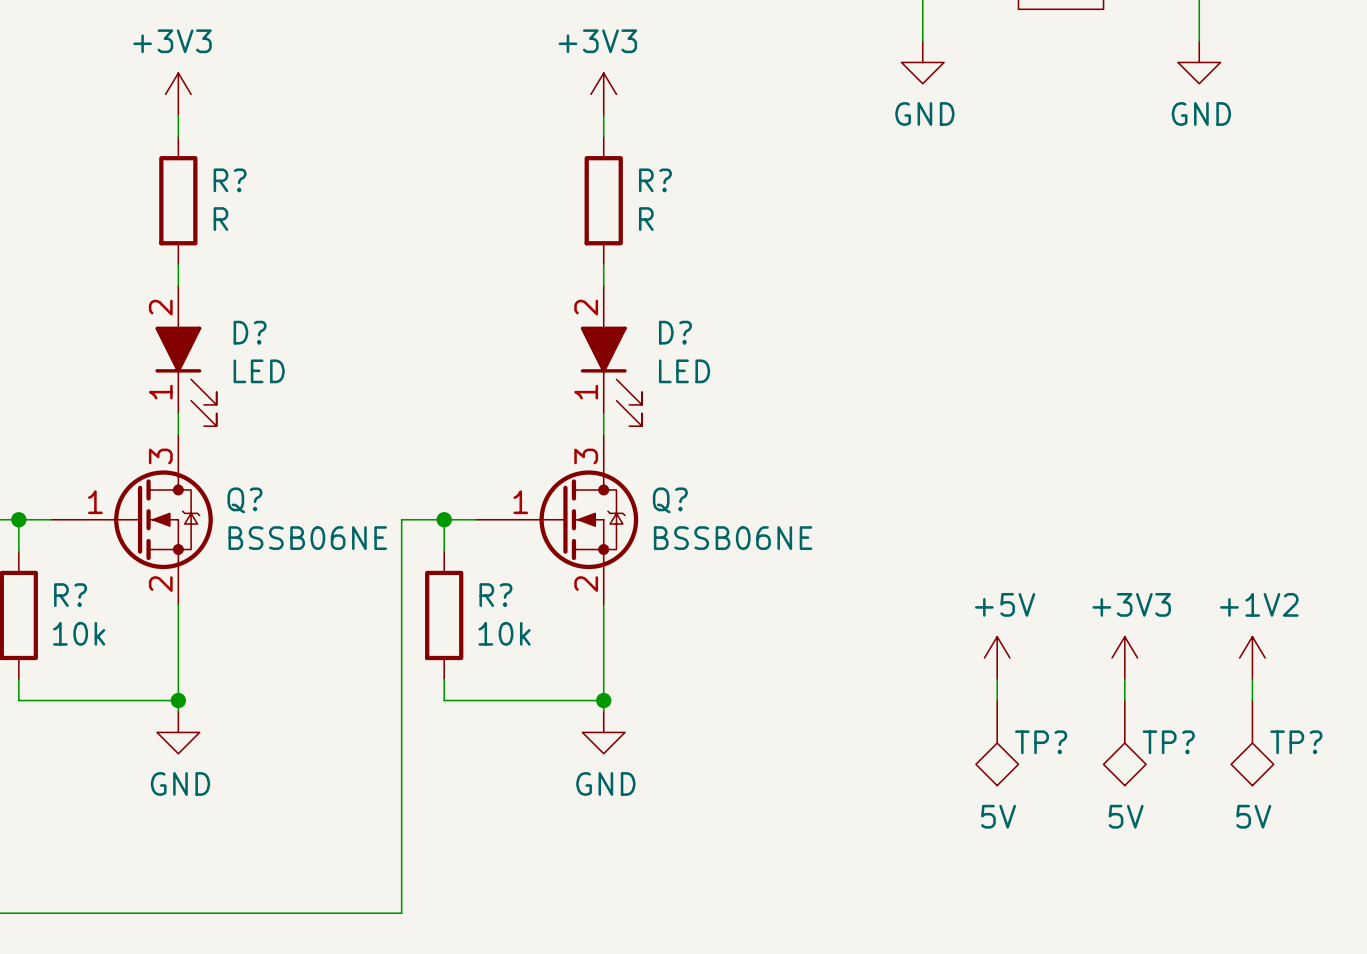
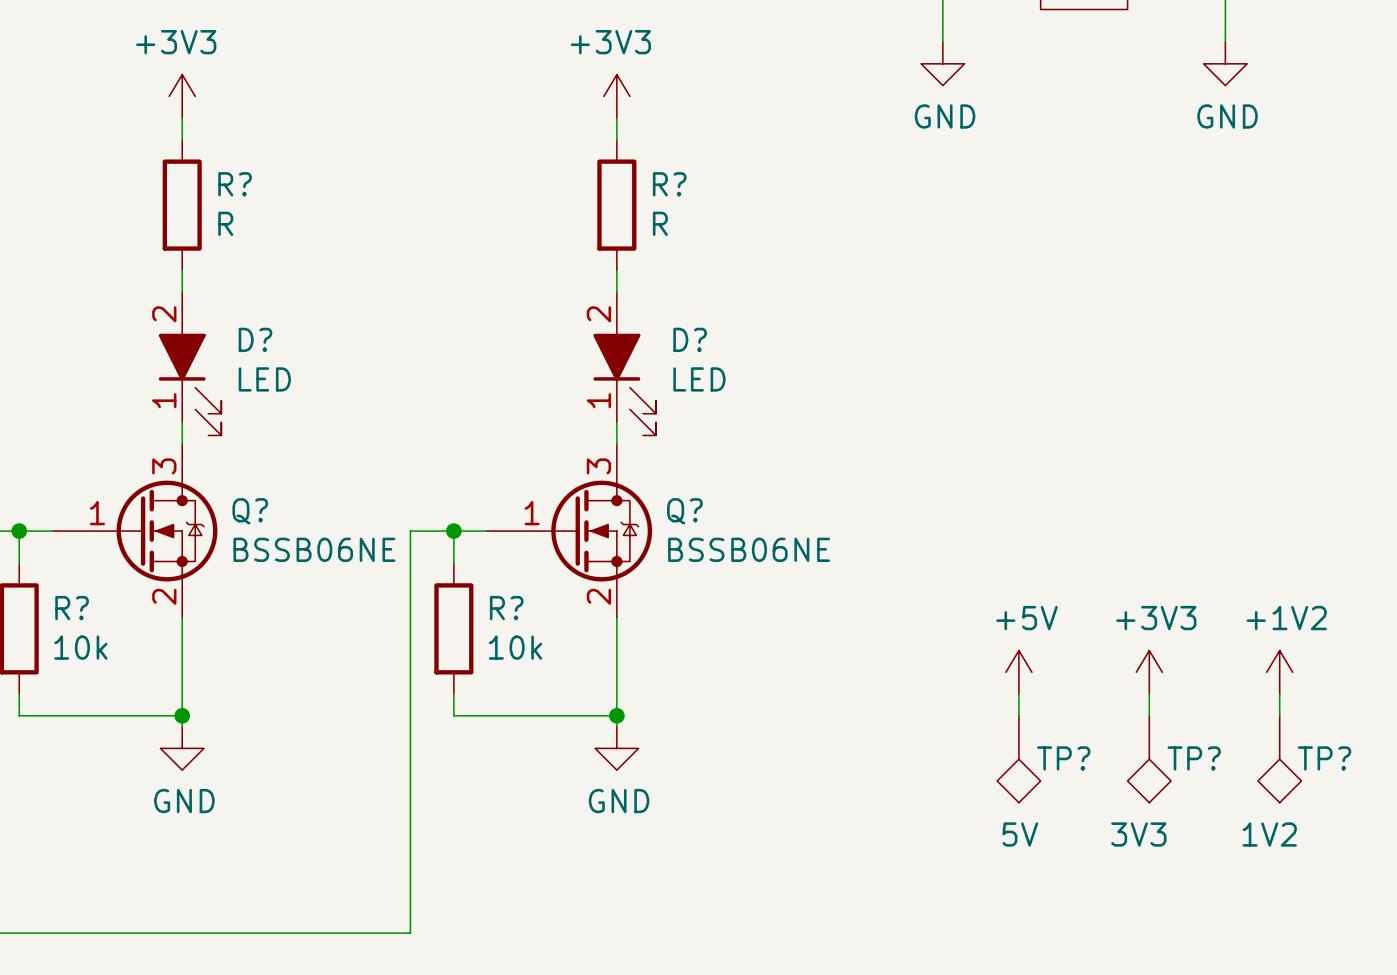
TP? value: 5V (1126, 816) -> 3V3 (1138, 834)
TP? value: 5V (1253, 816) -> 1V2 (1269, 834)

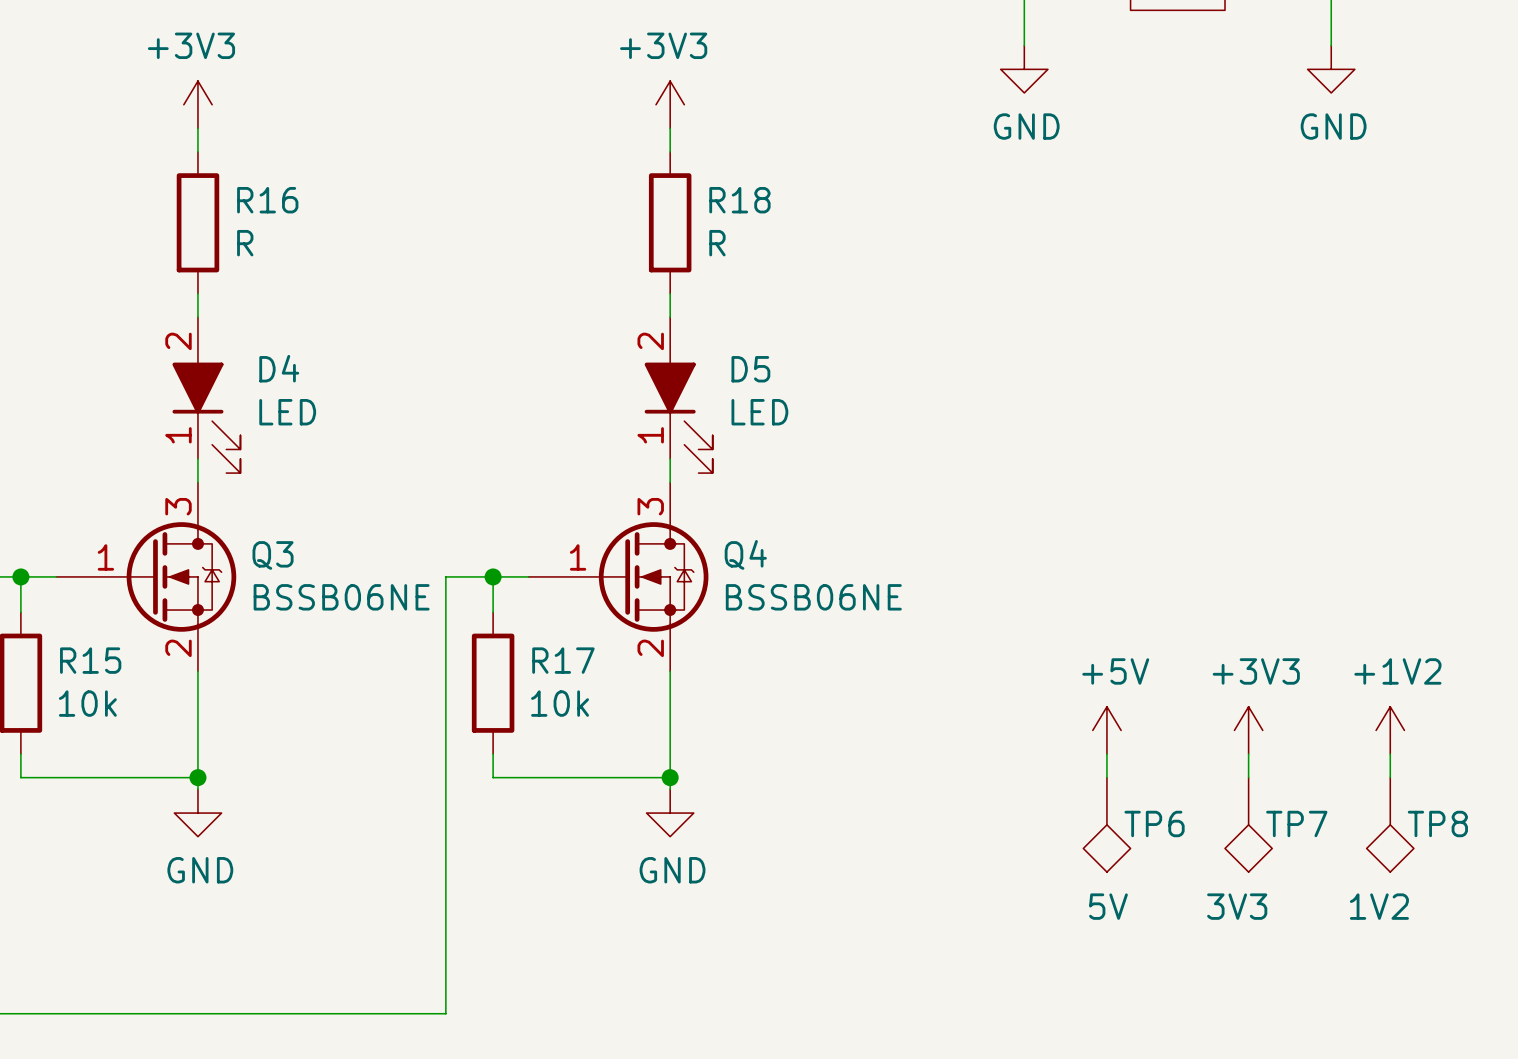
R? name: R? (235, 184) -> R16 (267, 200)
R? name: R? (669, 184) -> R18 (739, 200)
D? name: D? (255, 339) -> D4 (279, 368)
D? name: D? (690, 339) -> D5 (750, 369)
Q? name: Q? (250, 511) -> Q3 (273, 555)
Q? name: Q? (684, 511) -> Q4 (745, 554)
R? name: R? (72, 608) -> R15 (90, 660)
R? name: R? (506, 608) -> R17 (563, 660)
TP? name: TP? (1063, 758) -> TP6 (1154, 823)
TP? name: TP? (1194, 758) -> TP7 (1296, 823)
TP? name: TP? (1324, 758) -> TP8 (1437, 823)

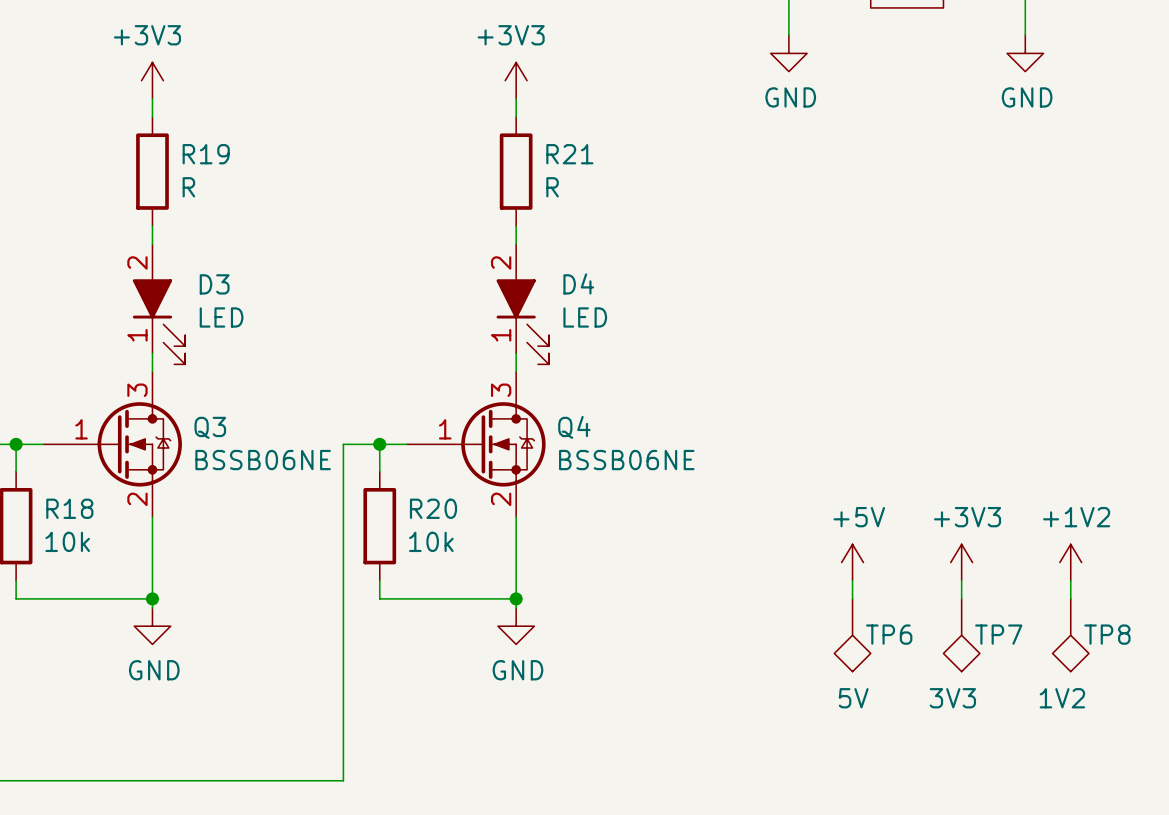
R16 name: R16 (267, 200) -> R19 (206, 154)
R18 name: R18 (739, 200) -> R21 (569, 154)
D4 name: D4 (279, 368) -> D3 (214, 284)
D5 name: D5 (750, 369) -> D4 (578, 283)
R15 name: R15 (90, 660) -> R18 (69, 508)
R17 name: R17 (563, 660) -> R20 (433, 508)

